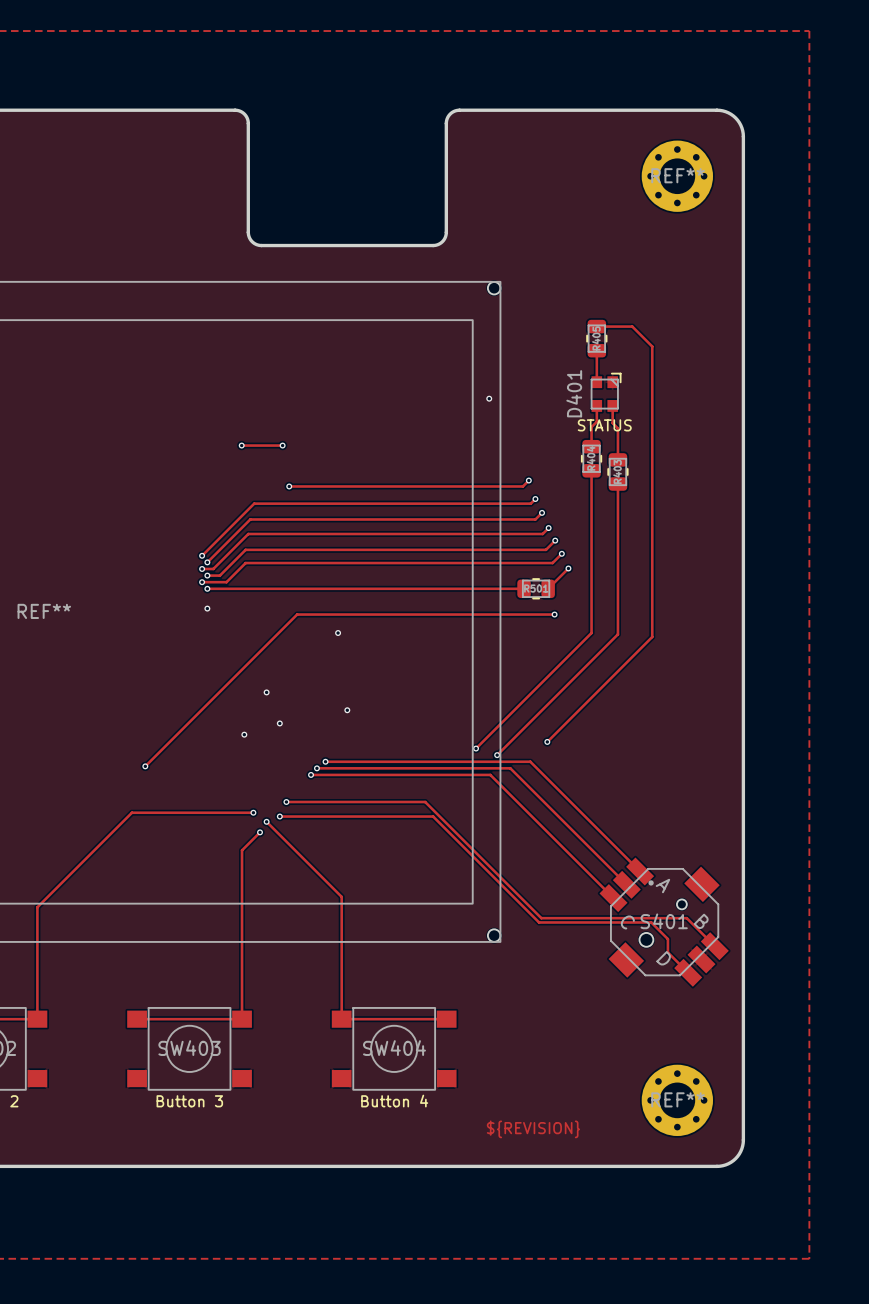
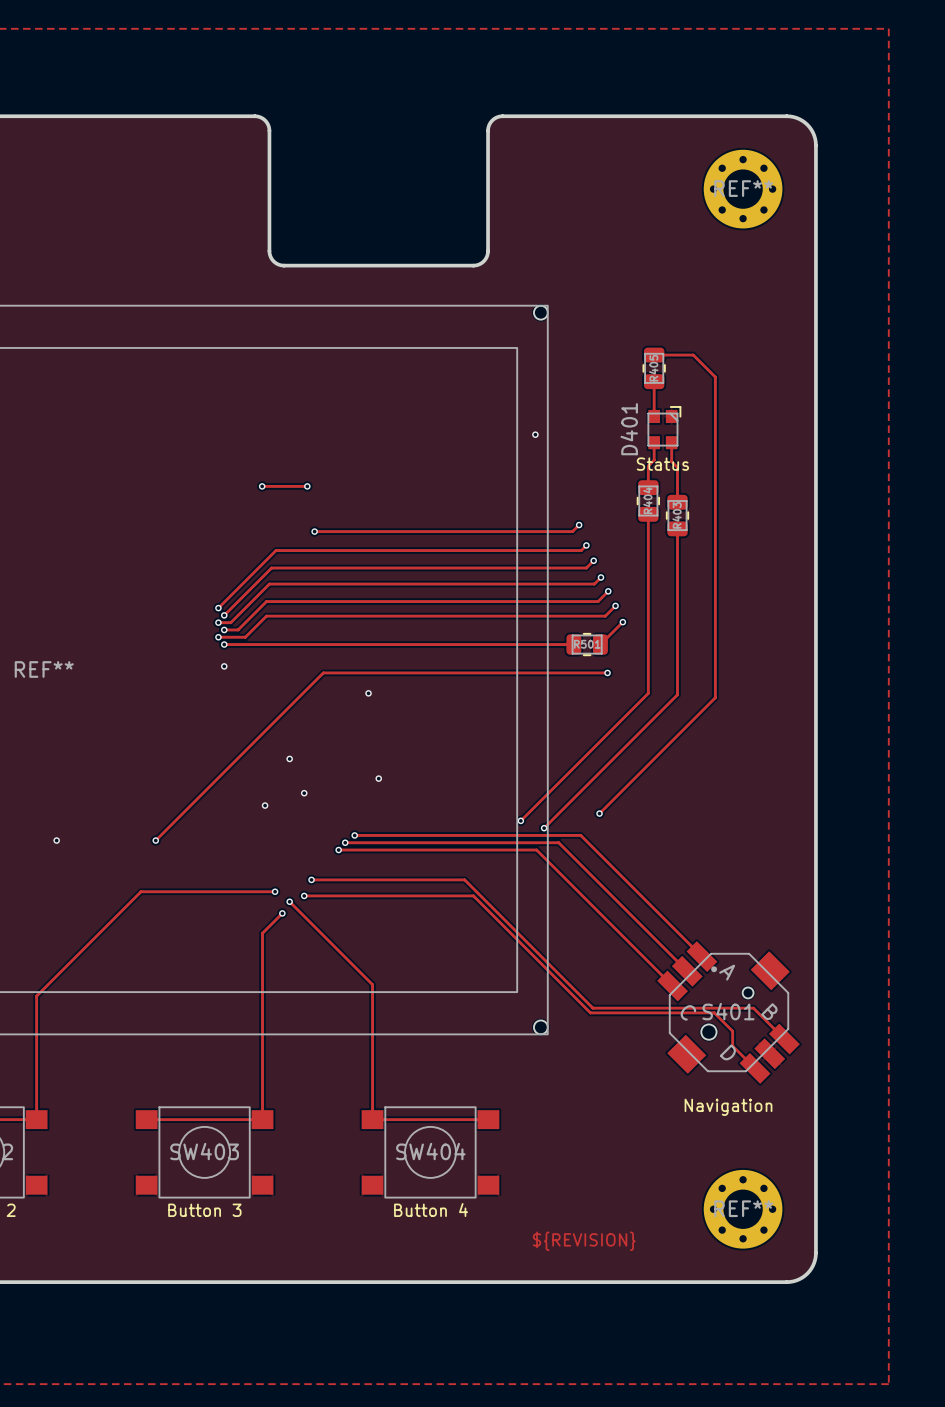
D401 value: STATUS (604, 425) -> Status (662, 464)
via: none -> (56, 840)
S401 value: none -> Navigation (728, 1107)

